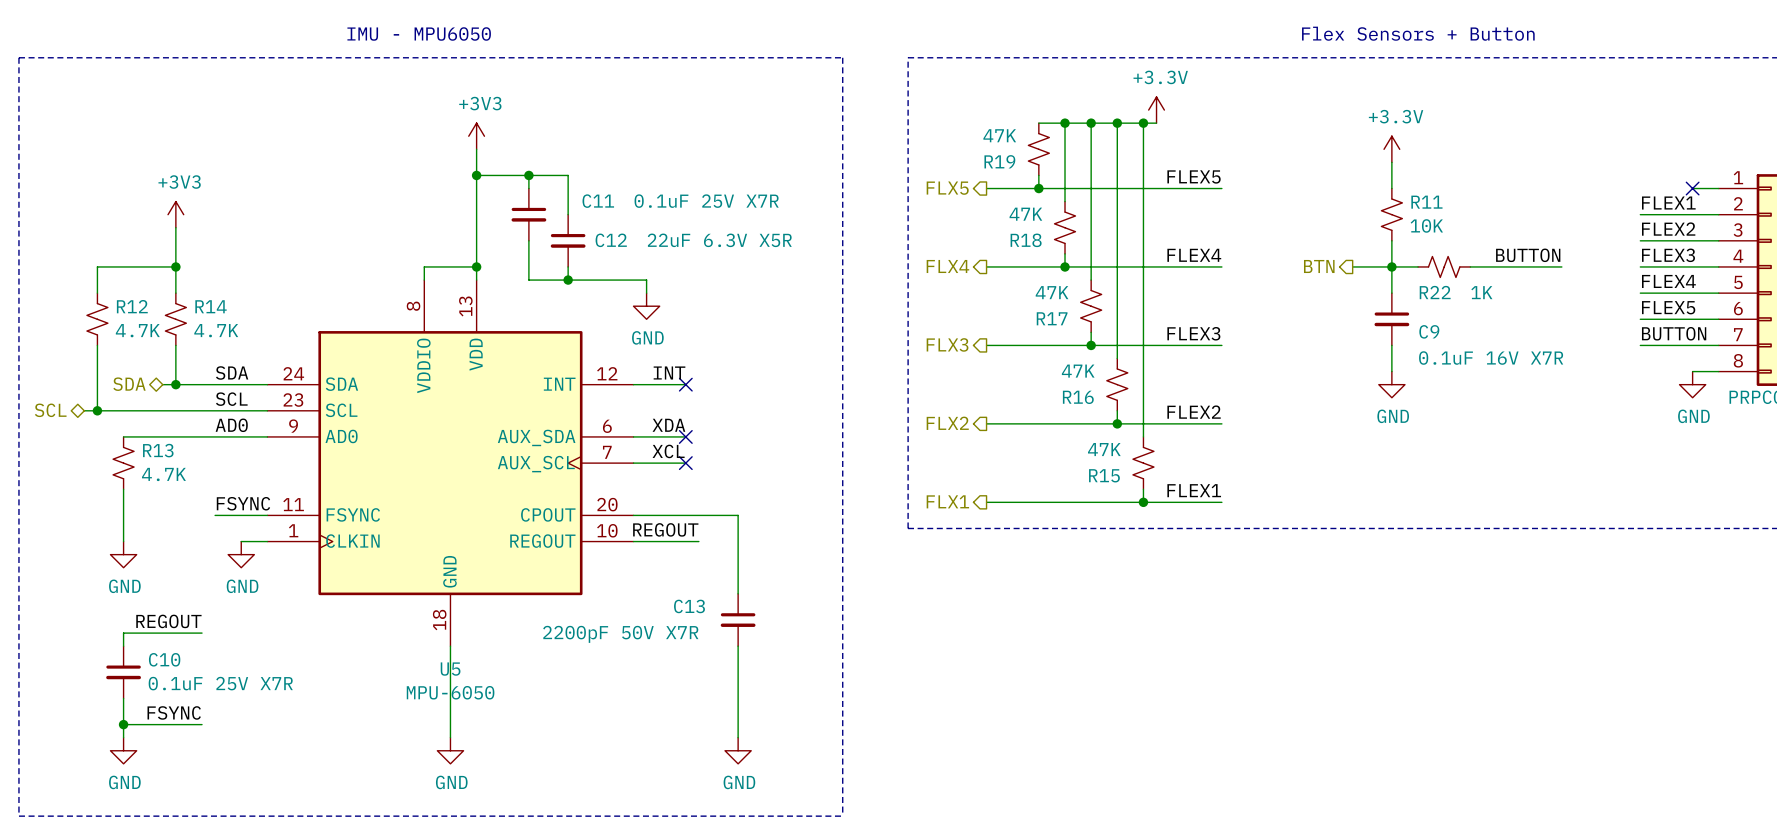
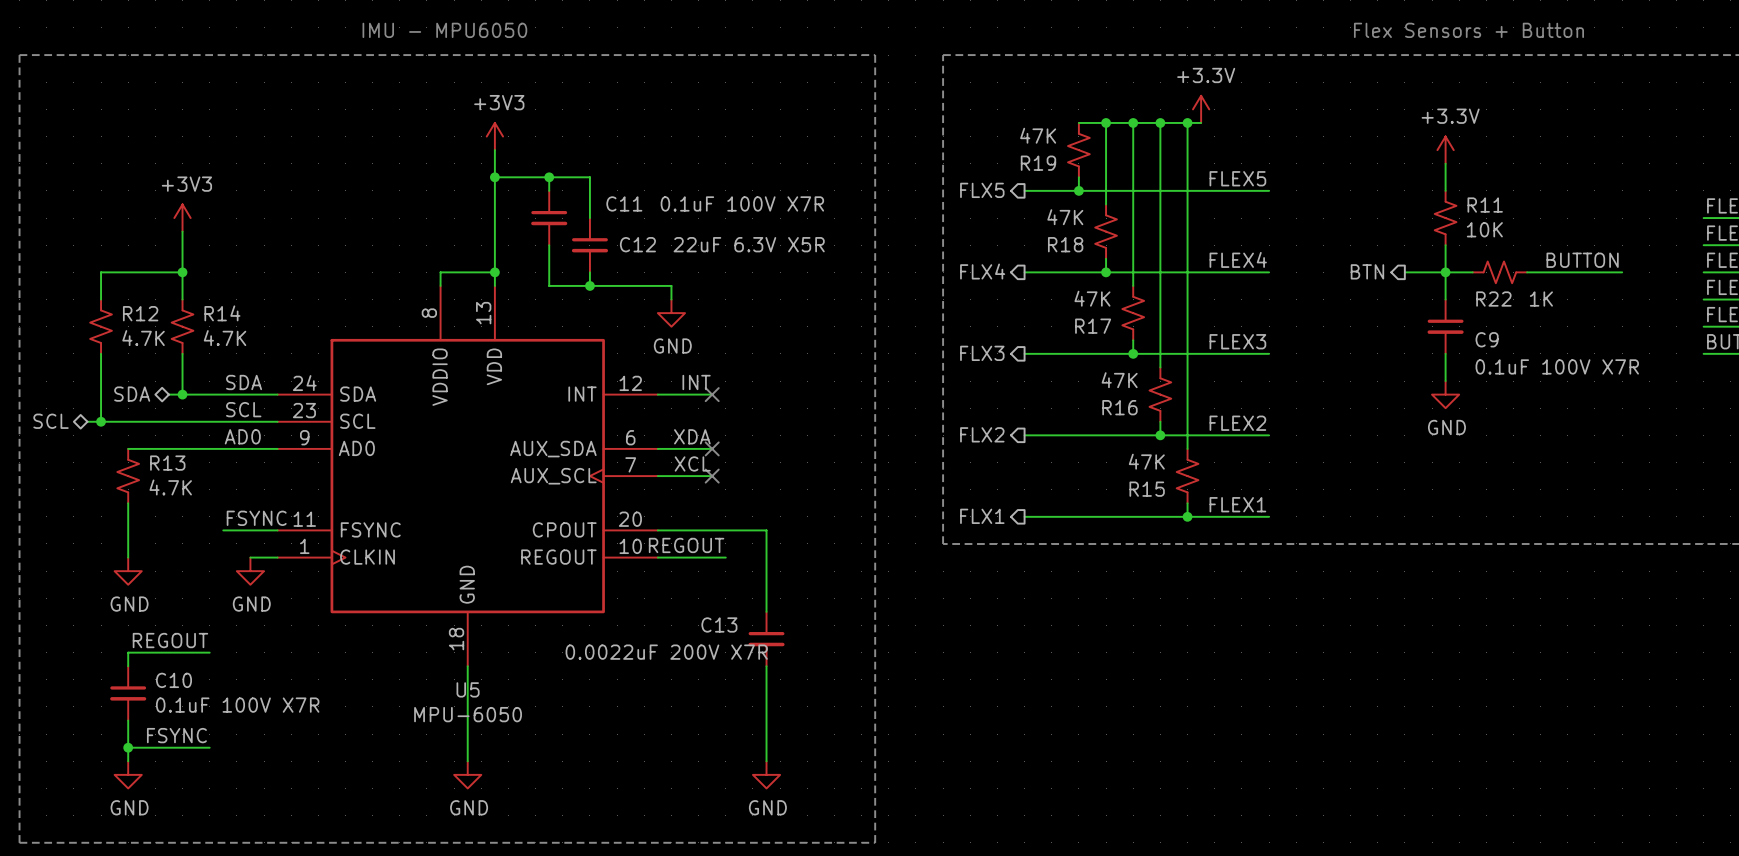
C11 value: 0.1uF 25V X7R (706, 201) -> 0.1uF 100V X7R (742, 203)
C9 value: 0.1uF 16V X7R (1491, 358) -> 0.1uF 100V X7R (1557, 366)
C13 value: 2200pF 50V X7R (620, 634) -> 0.0022uF 200V X7R (666, 652)
C10 value: 0.1uF 25V X7R (220, 683) -> 0.1uF 100V X7R (237, 705)

